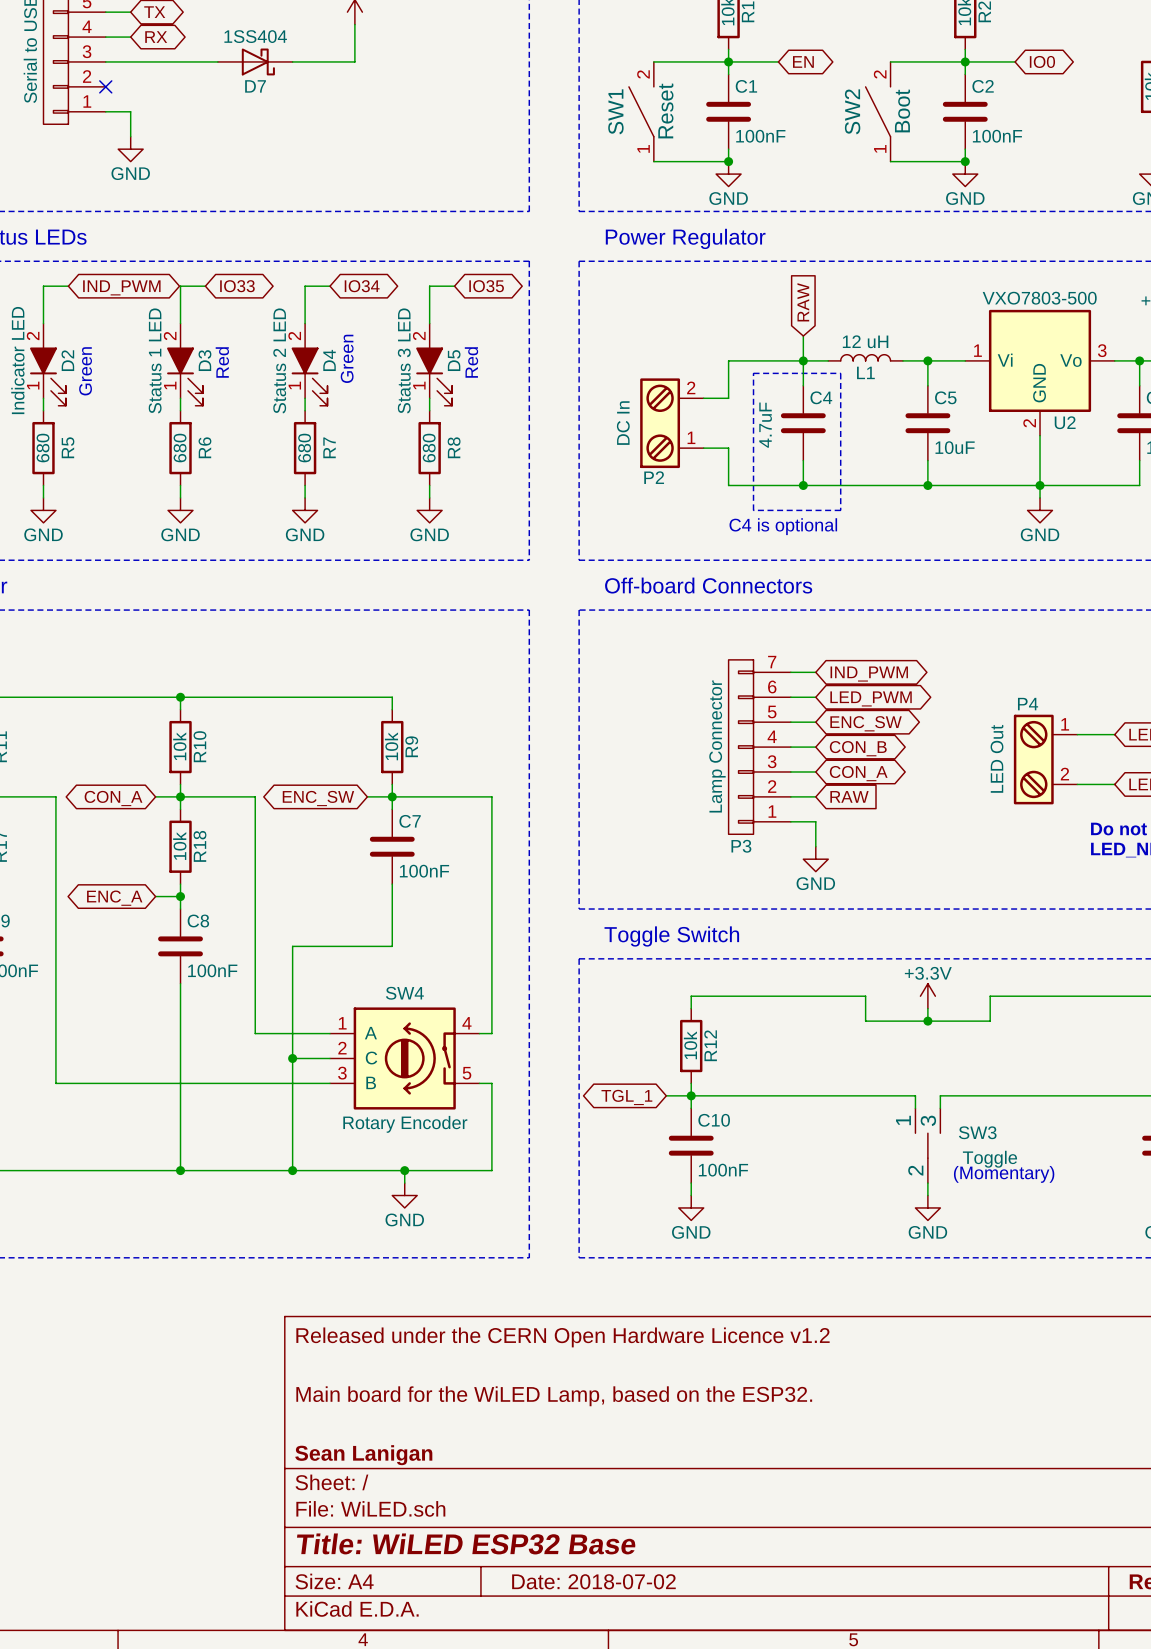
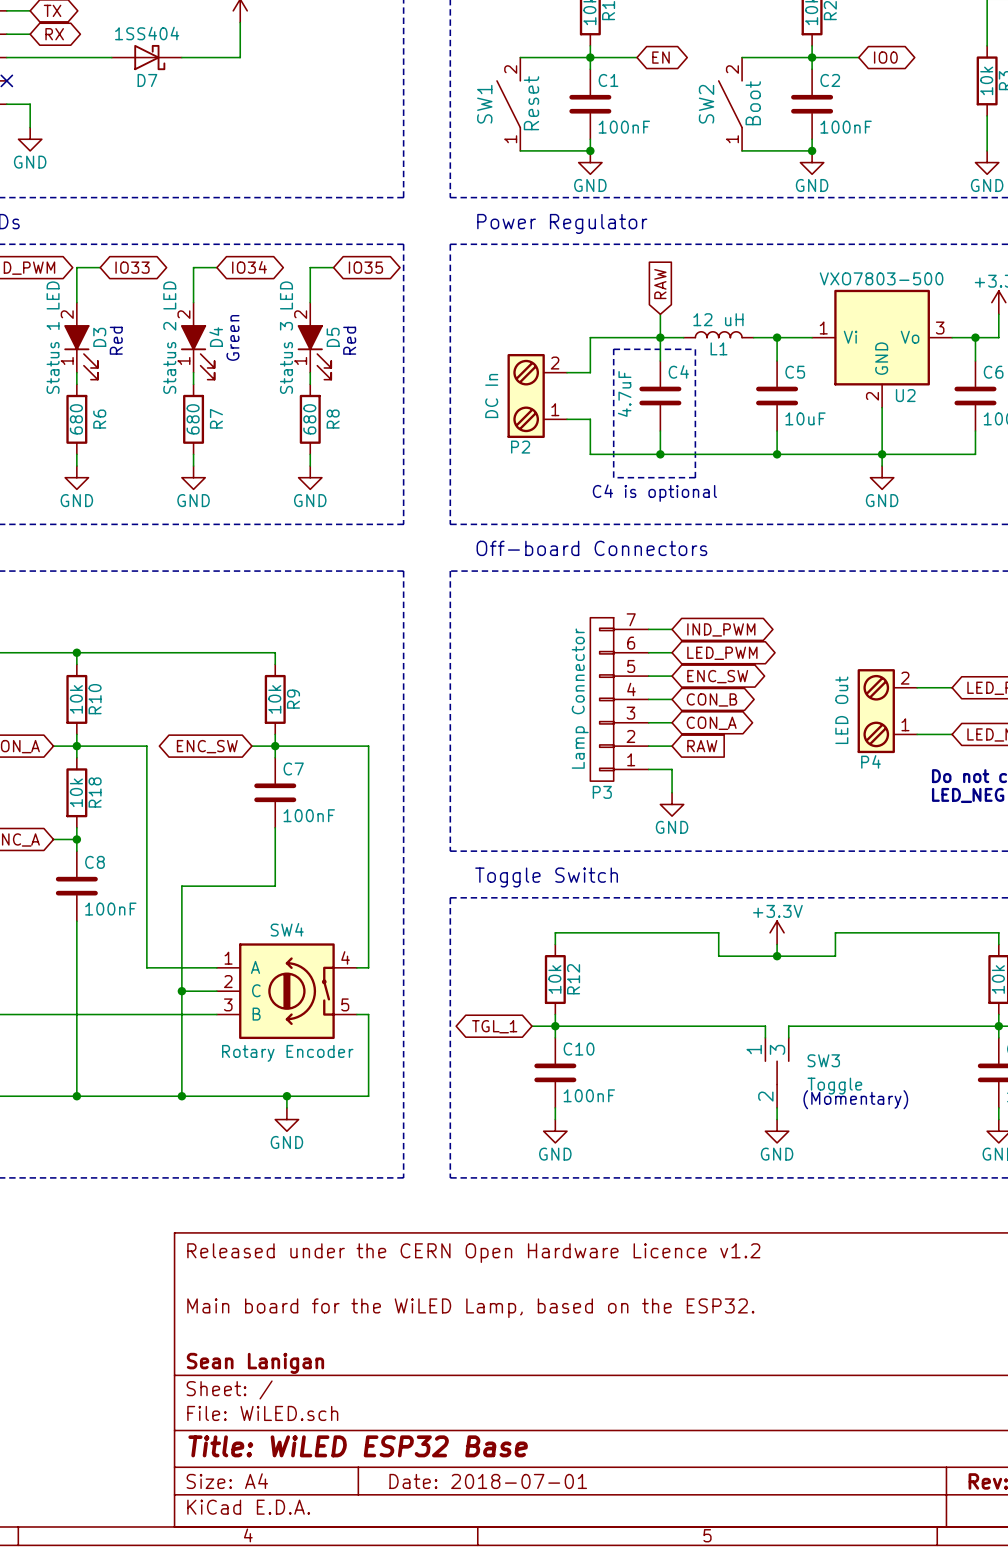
P4 flip: as is (1033, 759) -> up-down (876, 711)
title block: Date: 2018-07-02 (593, 1581) -> Date: 2018-07-01 (488, 1481)

